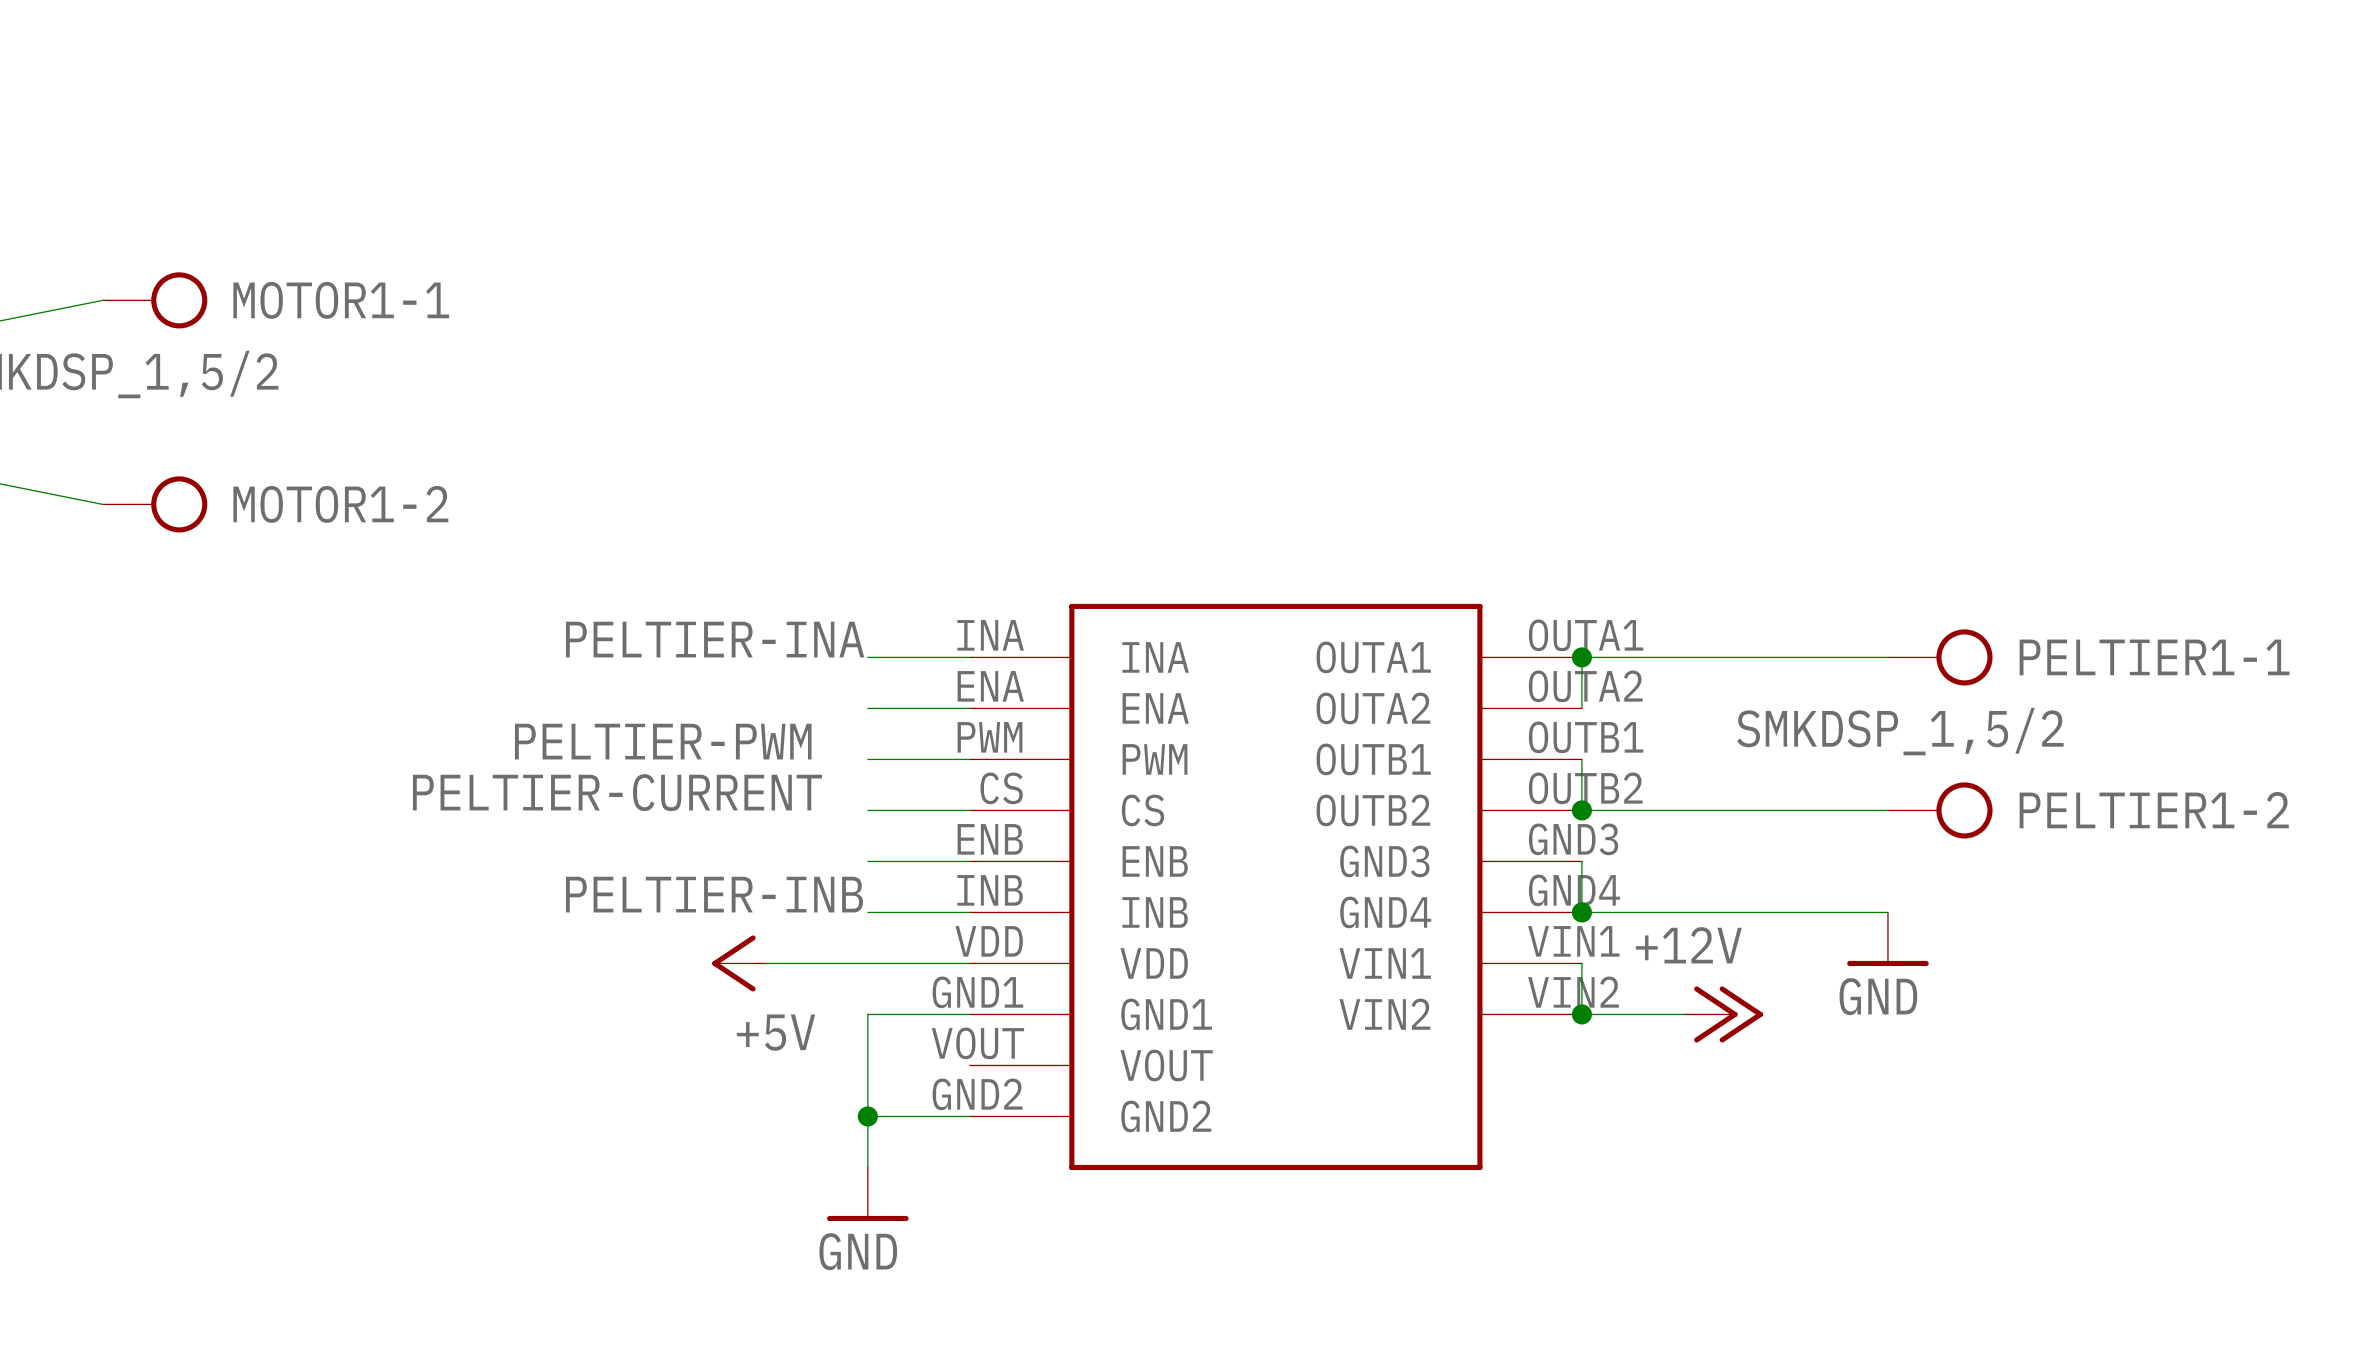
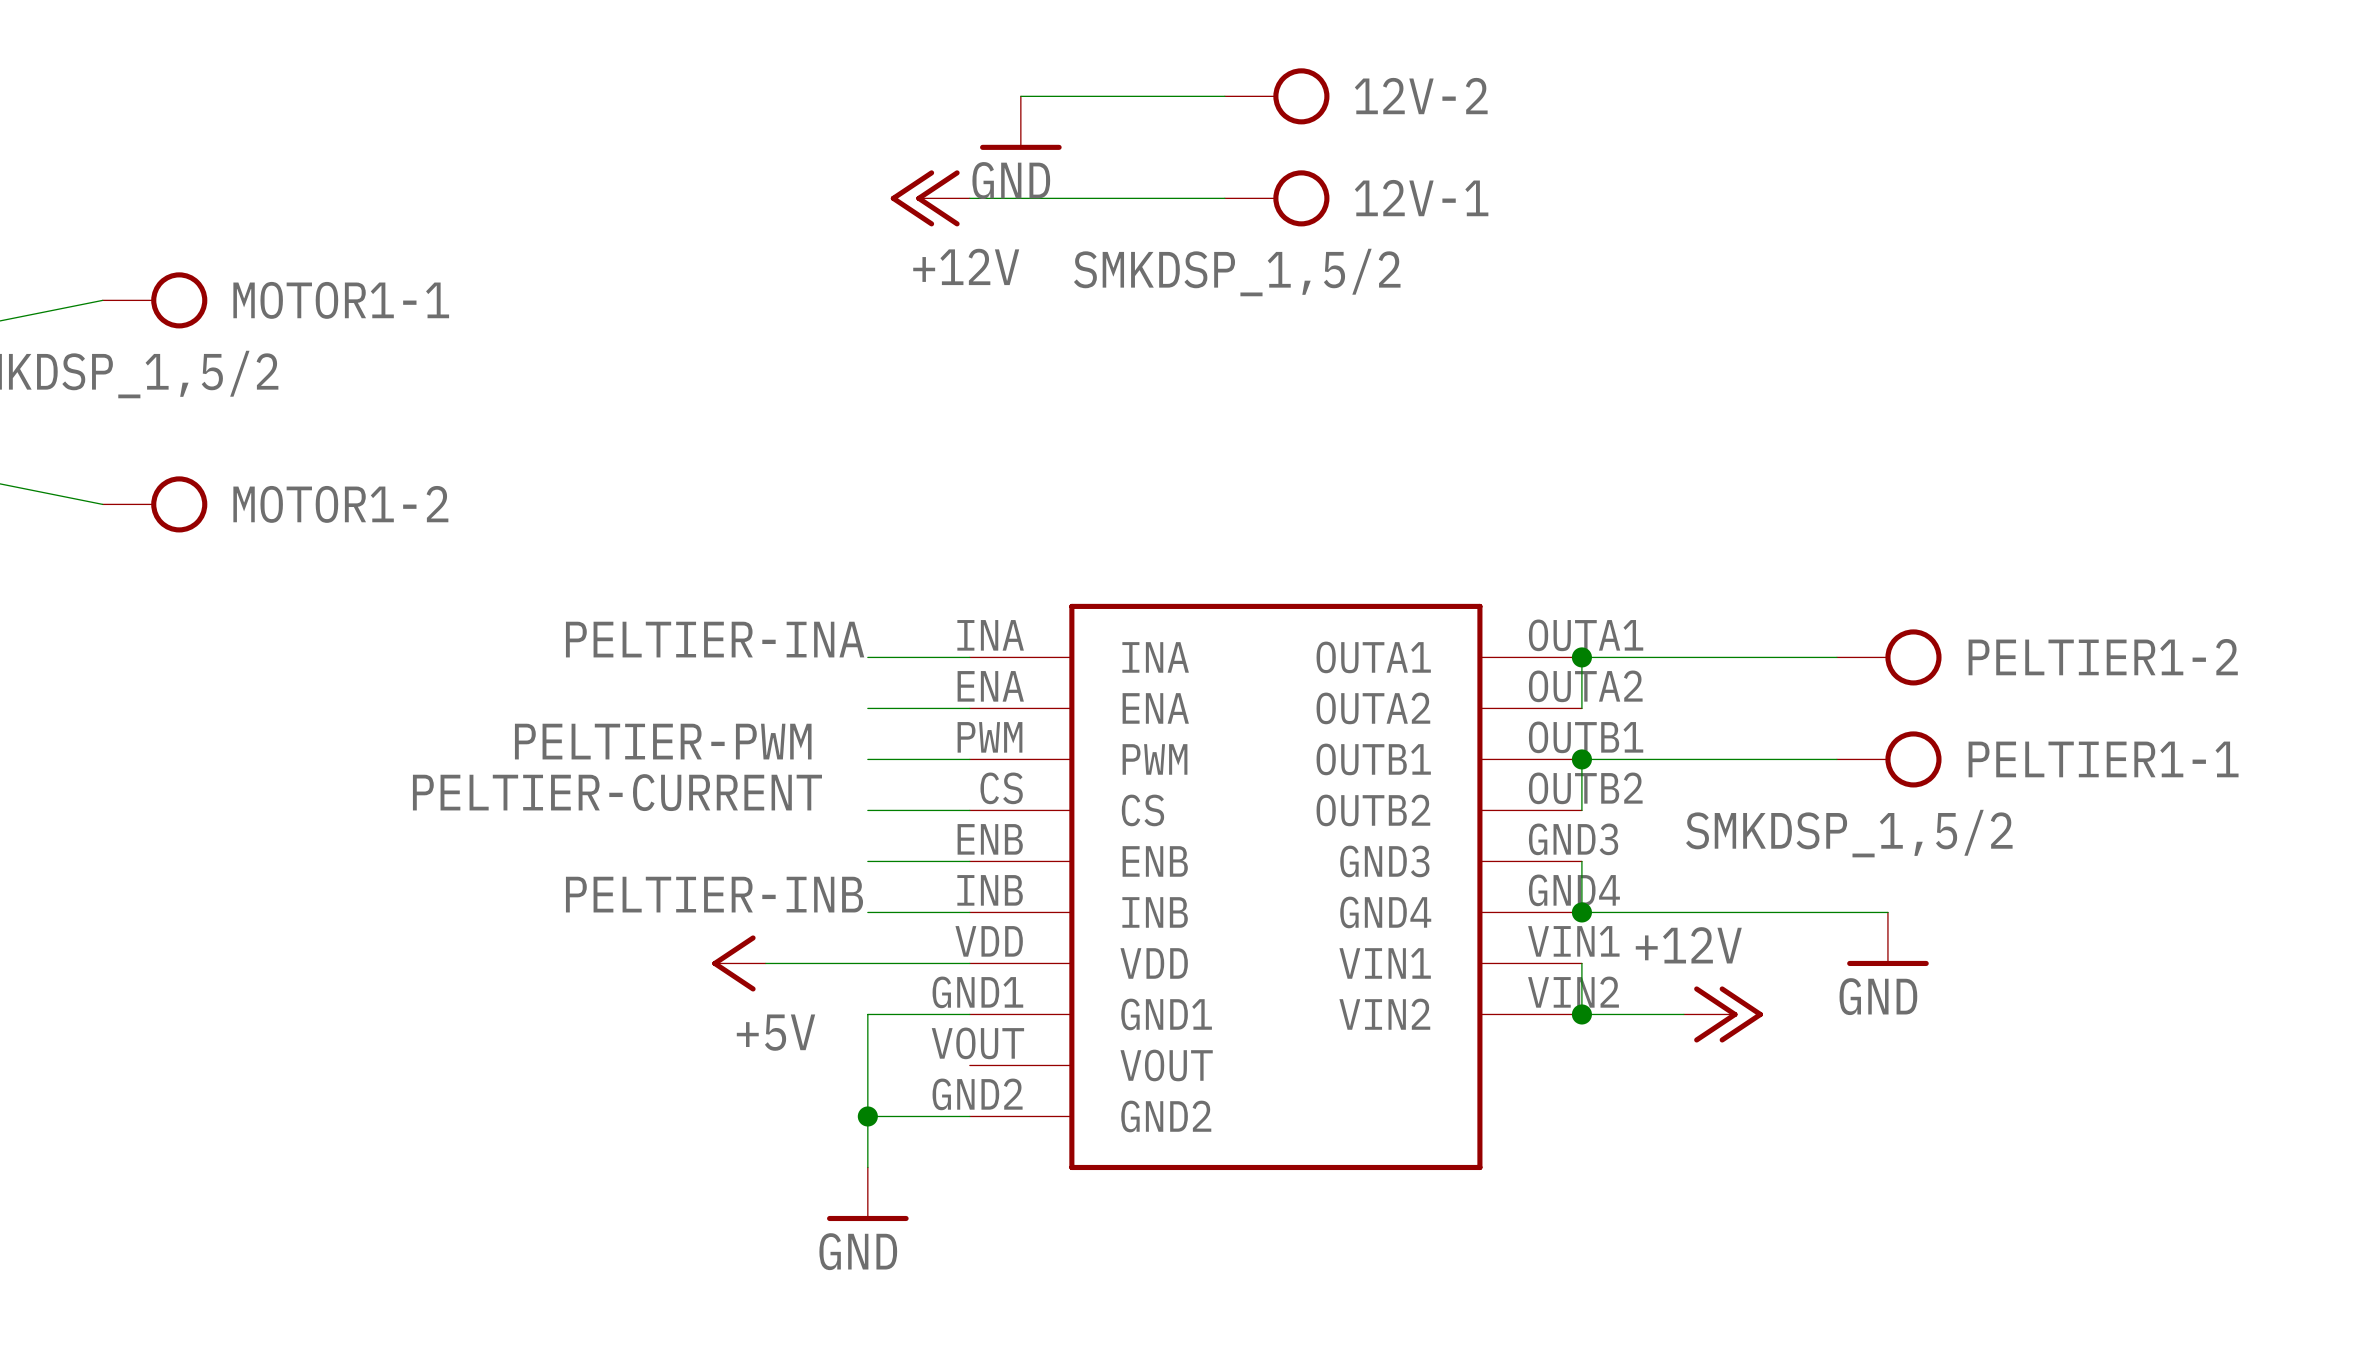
wire: none -> (1020, 96) (1224, 96)
12V-2: none -> (1277, 96)
power symbol: none -> GND (1020, 123)
power symbol: none -> +12V (930, 198)
wire: none -> (969, 198) (1224, 198)
12V-1: none -> SMKDSP_1,5/2 (1277, 198)
PELTIER1-1 position: (1940, 657) -> (1889, 759)
wire: none -> (1581, 759) (1836, 759)
wire: (1581, 810) (1887, 810) -> none
junction position: (1581, 810) -> (1581, 759)
PELTIER1-2 position: (1940, 810) -> (1889, 657)

